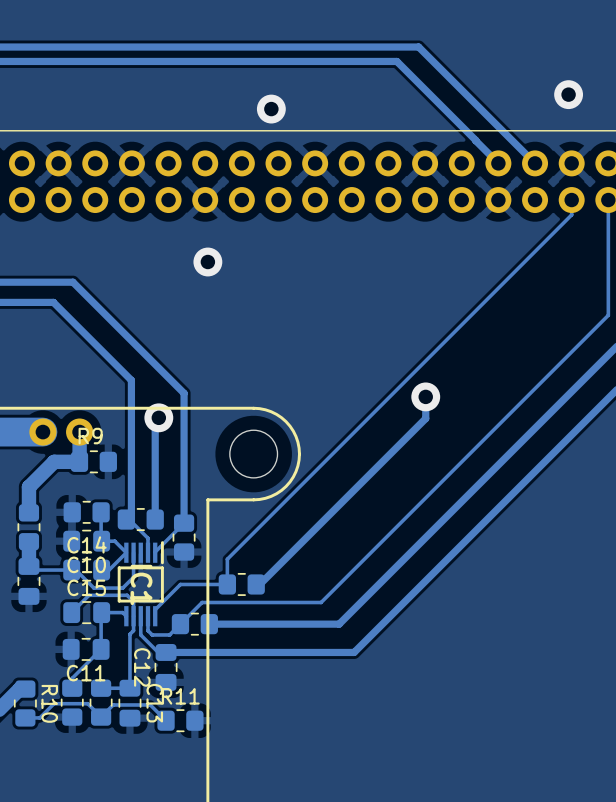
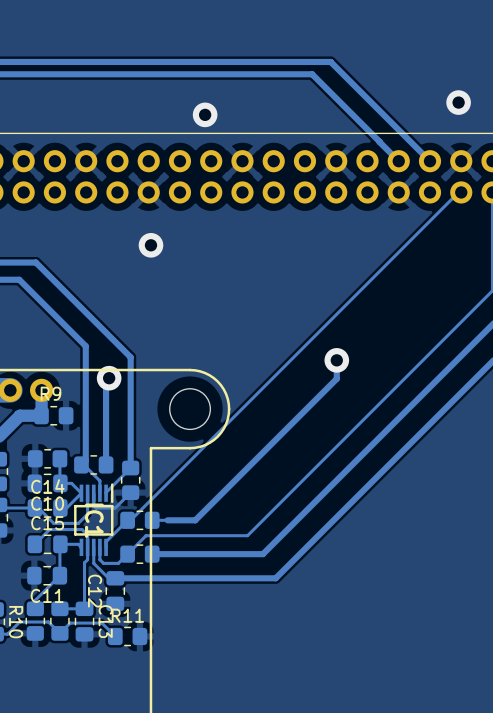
track: (571, 200) (571, 214) (227, 559) (227, 584) -> (195, 520) (167, 520)
track: none -> (130, 492) (115, 508) (96, 508) (93, 505) (93, 493)
track: (209, 584) (184, 584) -> (458, 192) (130, 520)
part position: (241, 584) -> (139, 520)

